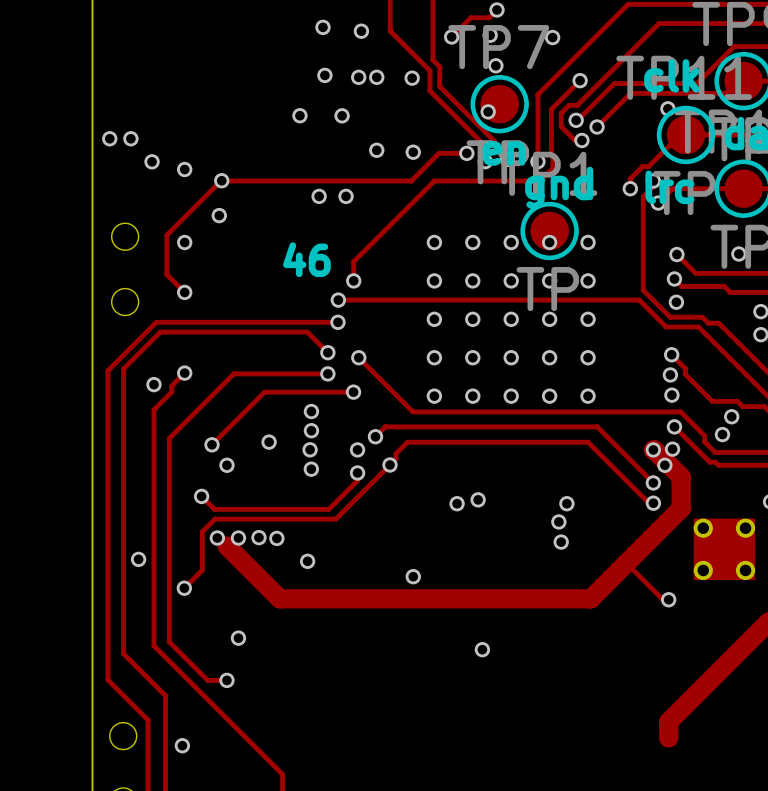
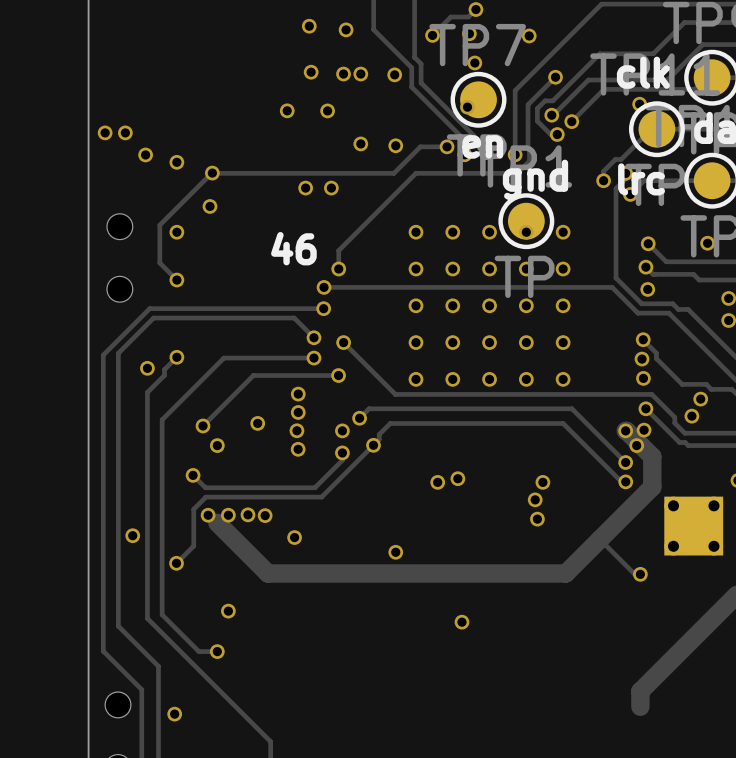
track: (714, 23) (659, 23) (626, 56) -> (684, 22) (653, 53) (599, 53)

